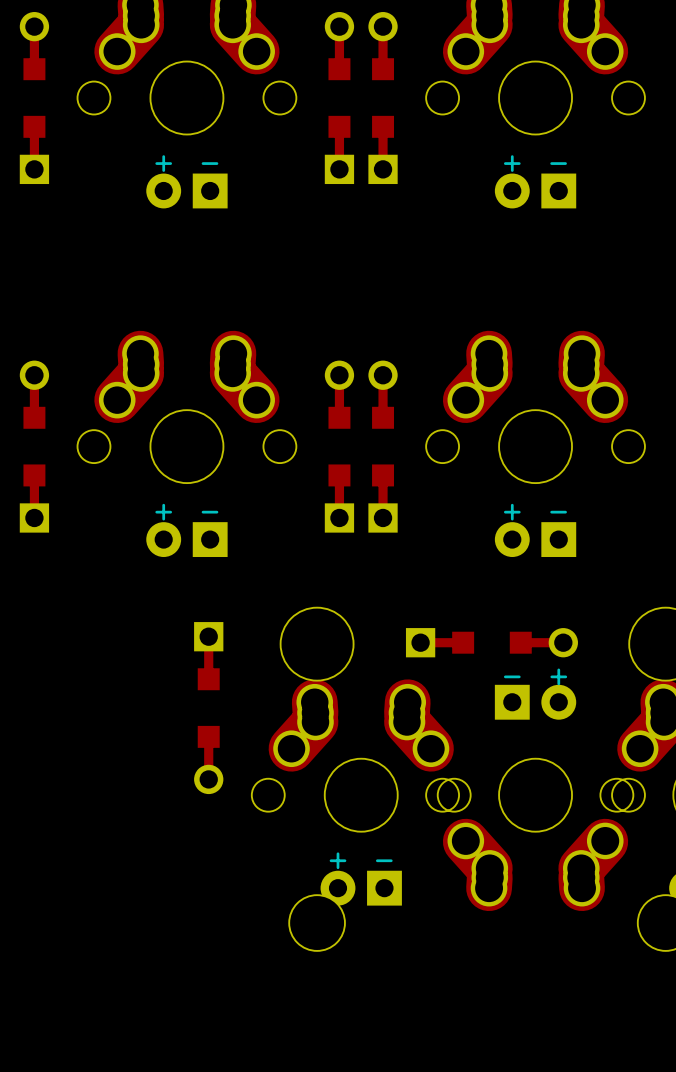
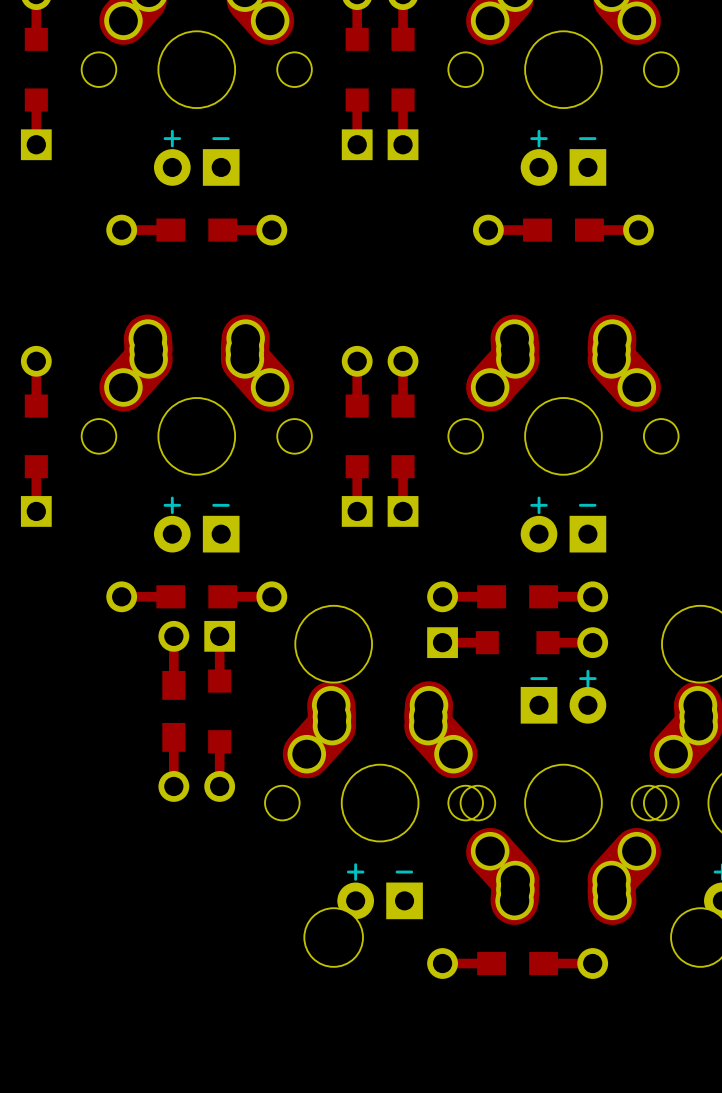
part: none -> (196, 230)
part: none -> (563, 230)
part: none -> (196, 596)
part: none -> (517, 596)
part: none -> (173, 711)
part: none -> (517, 963)

